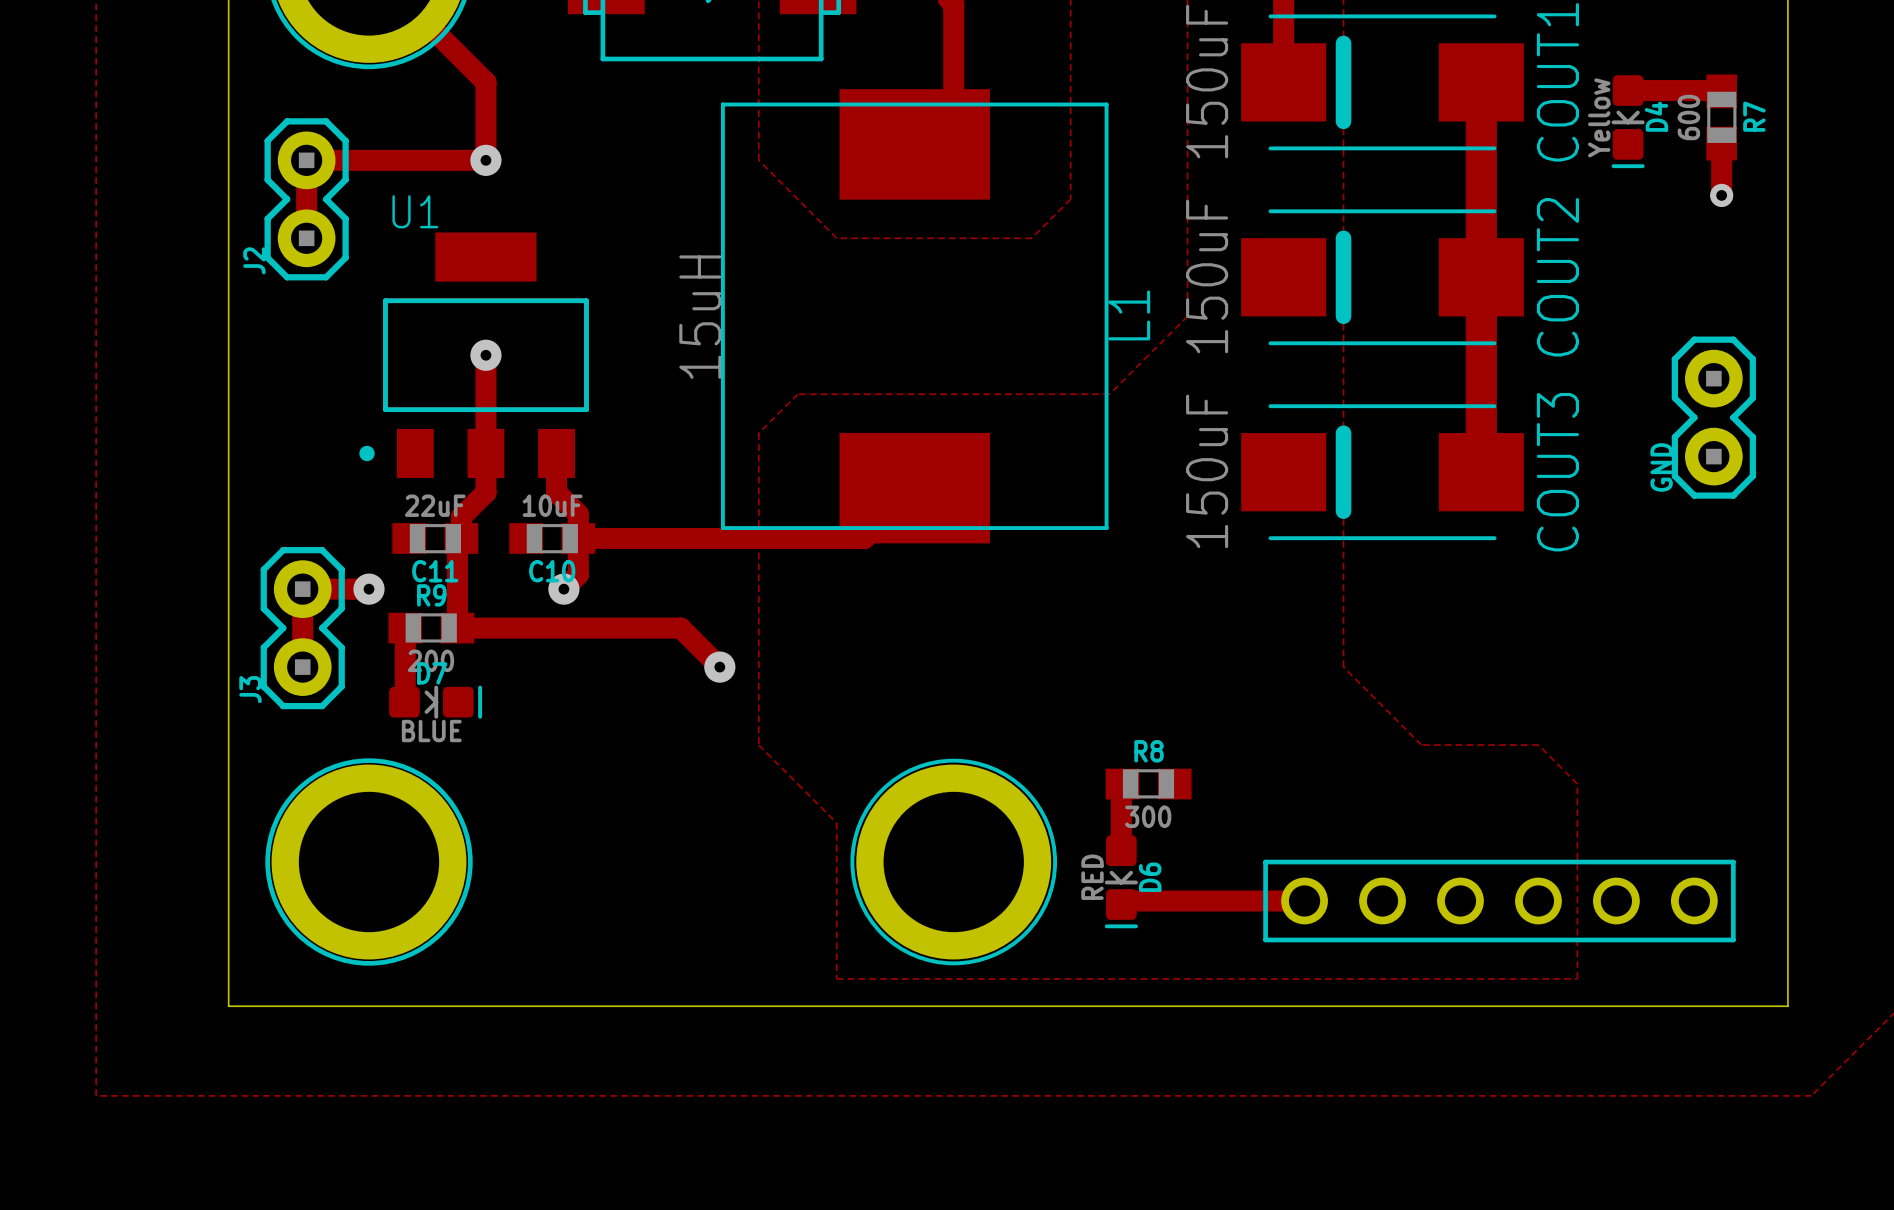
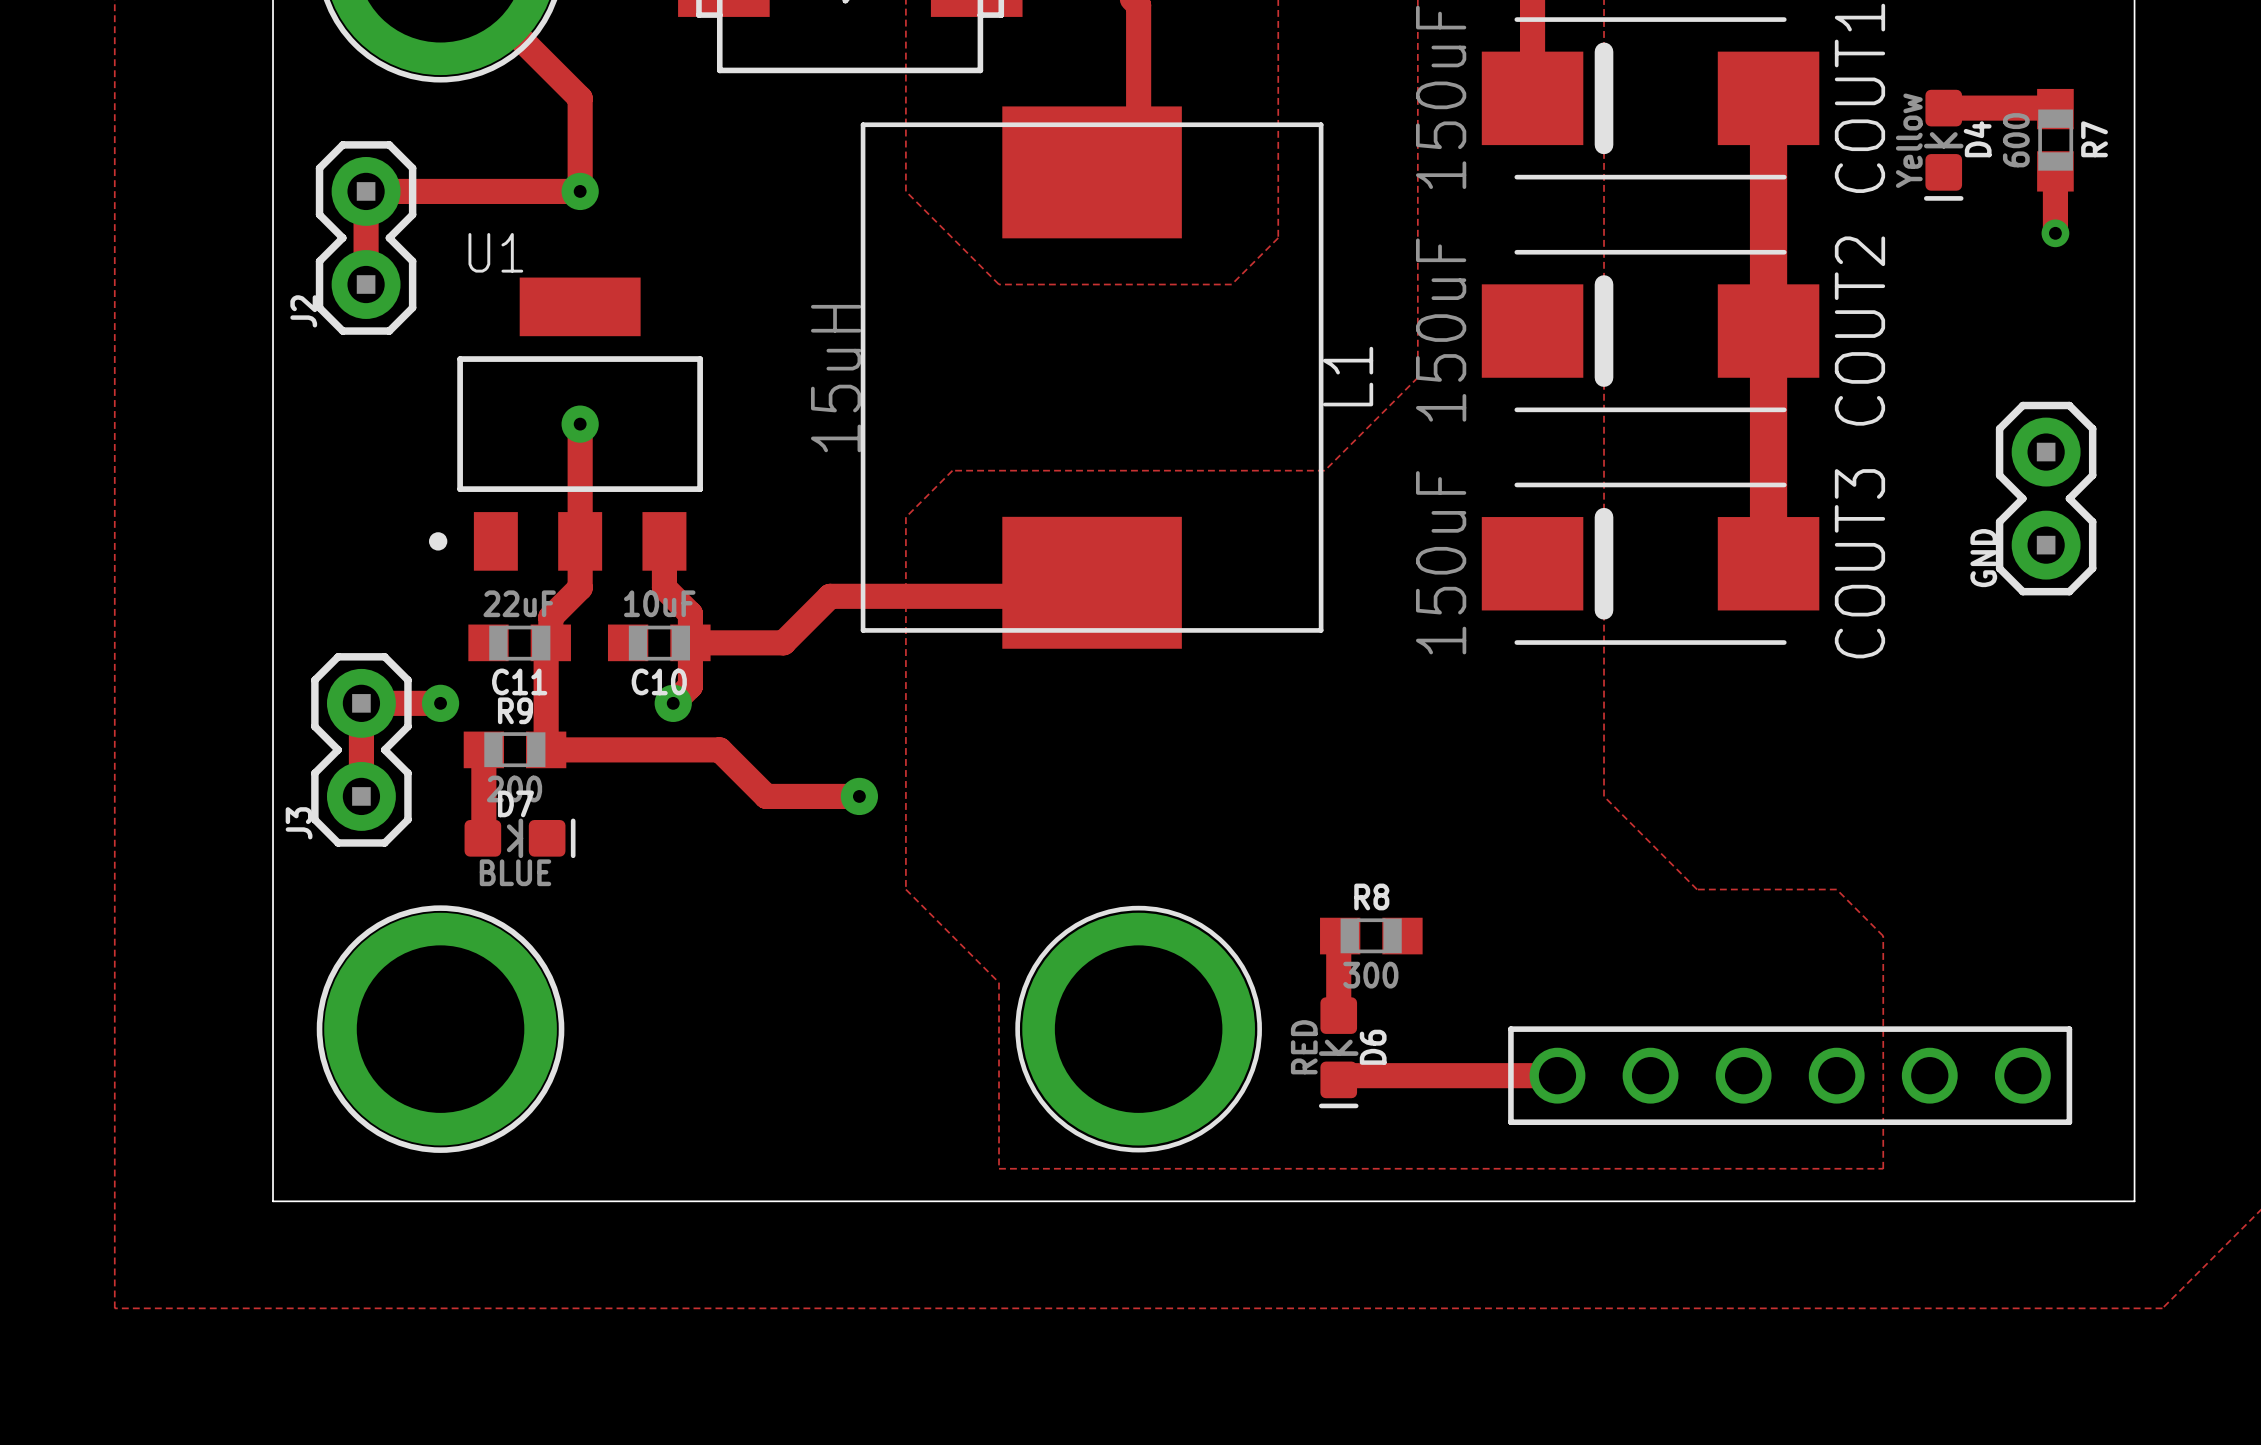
track: (903, 499) (864, 538) (656, 538) -> (1078, 596) (830, 596) (783, 642)
track: (602, 628) (680, 628) (719, 667) -> (719, 749) (766, 796) (859, 796)

